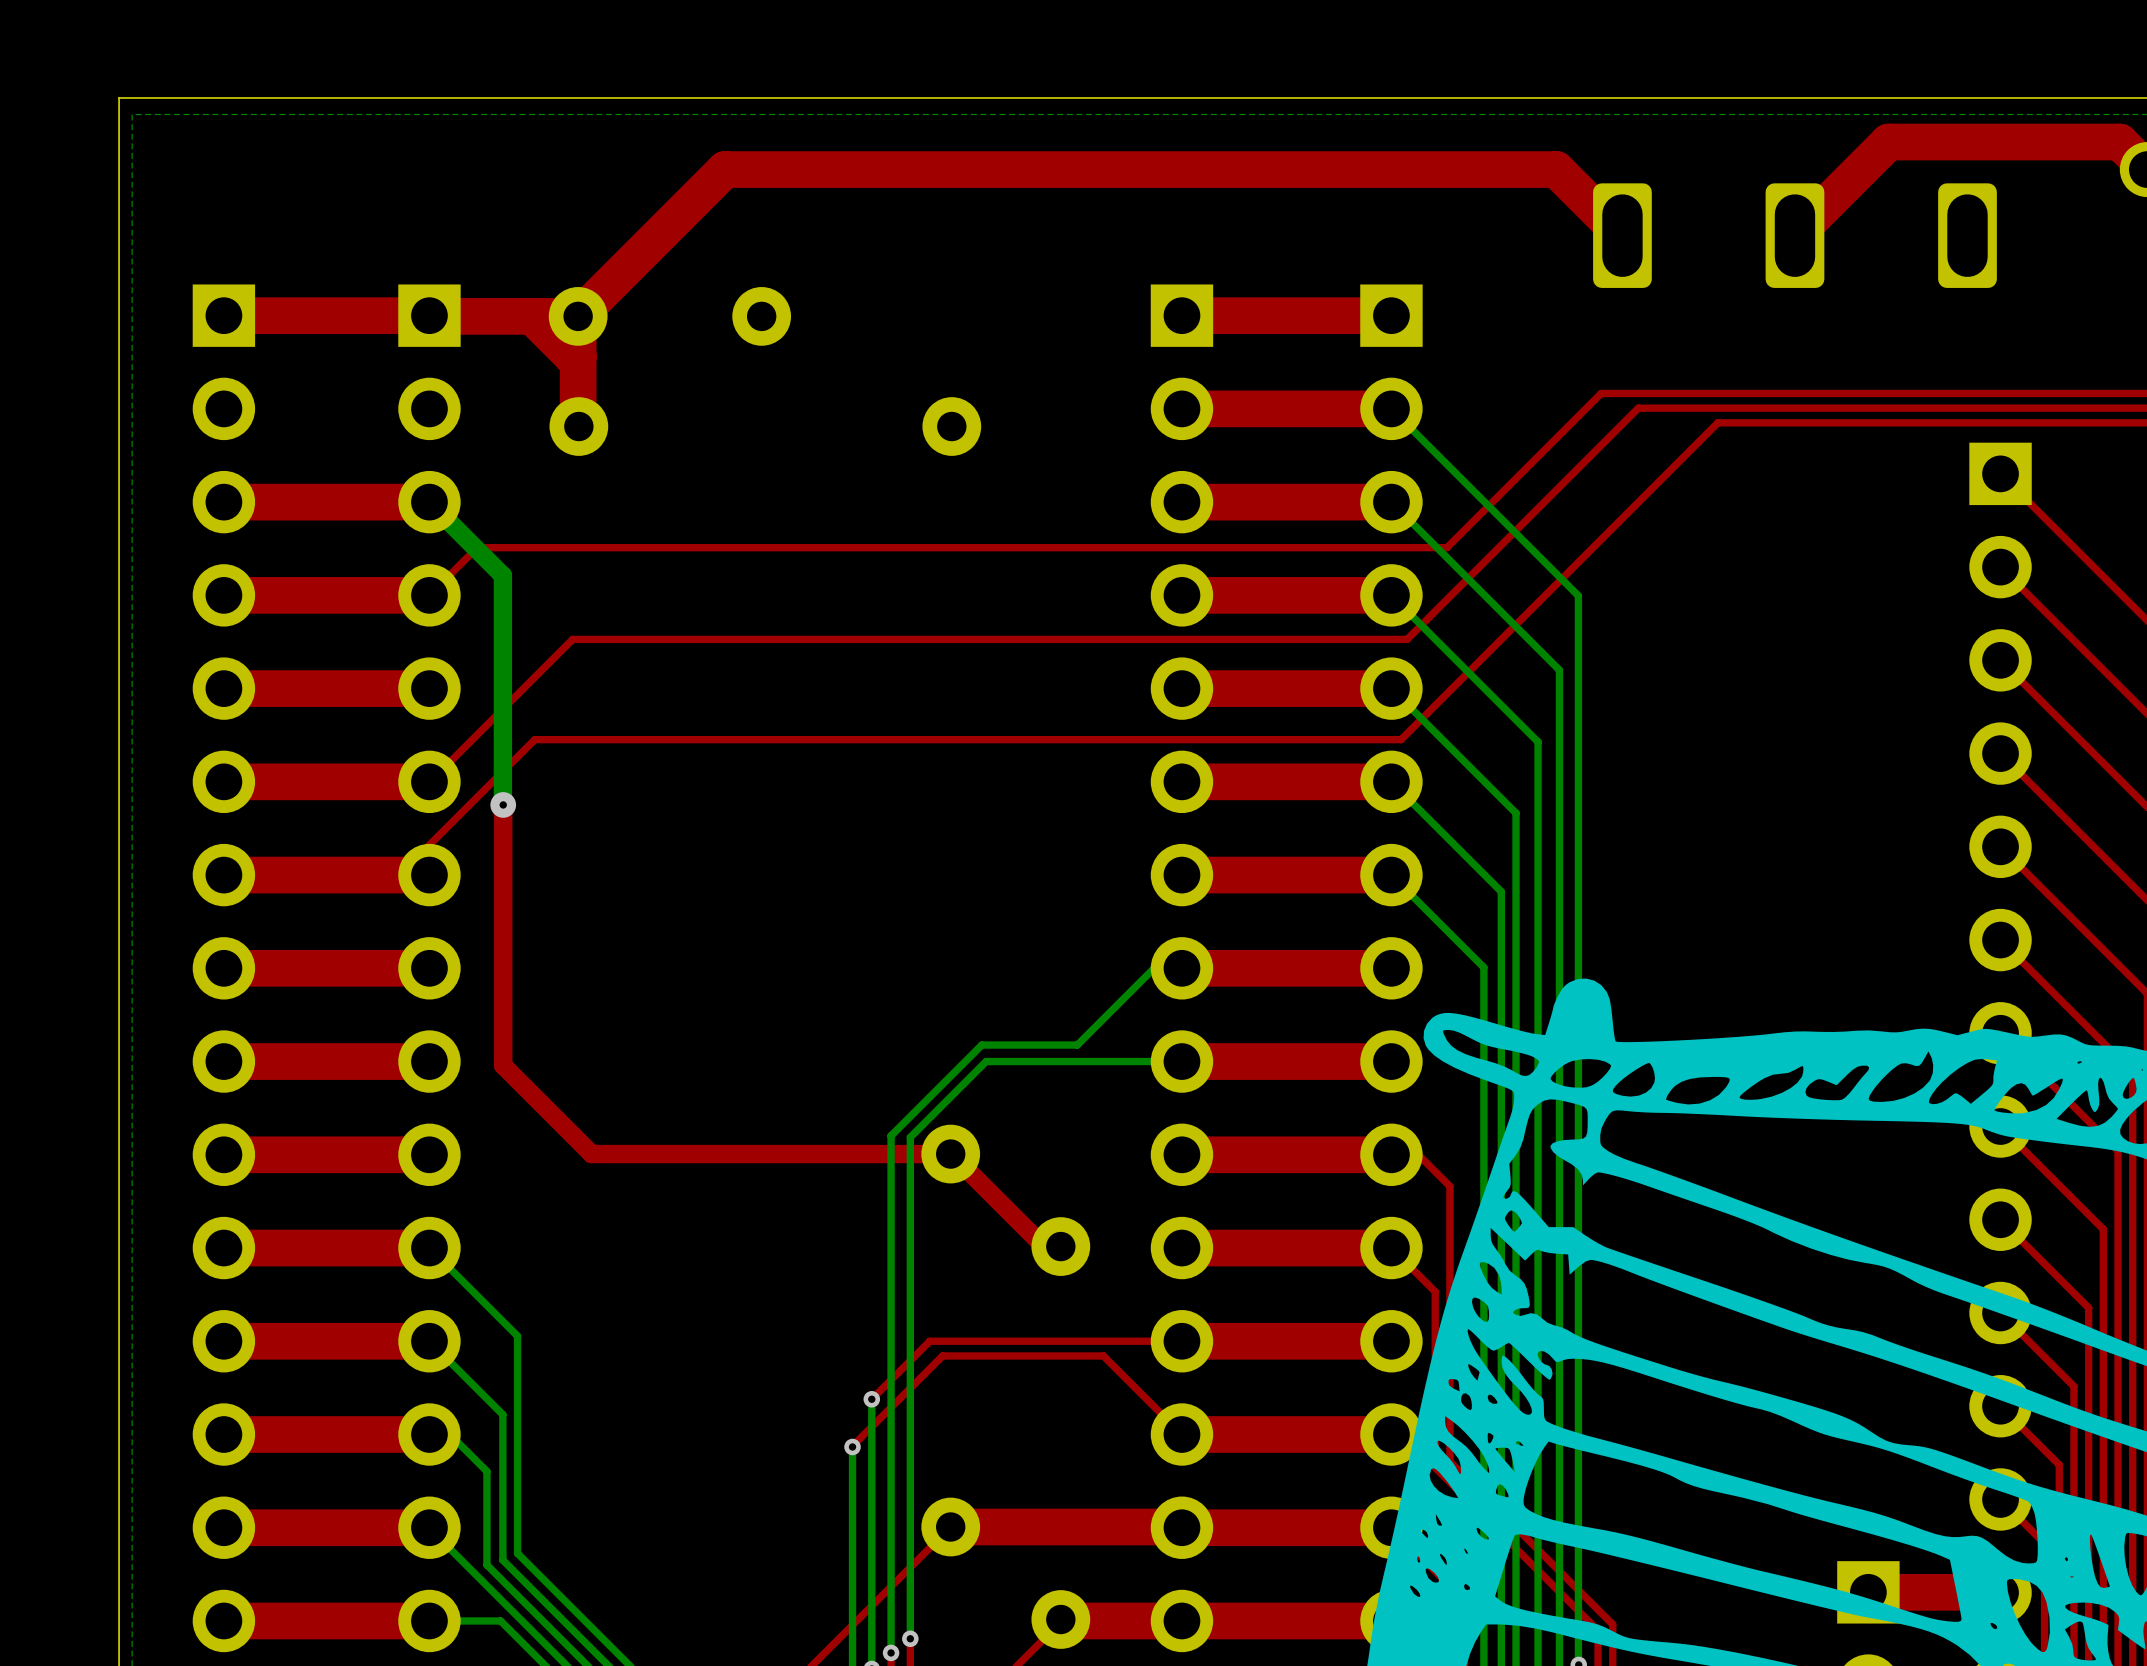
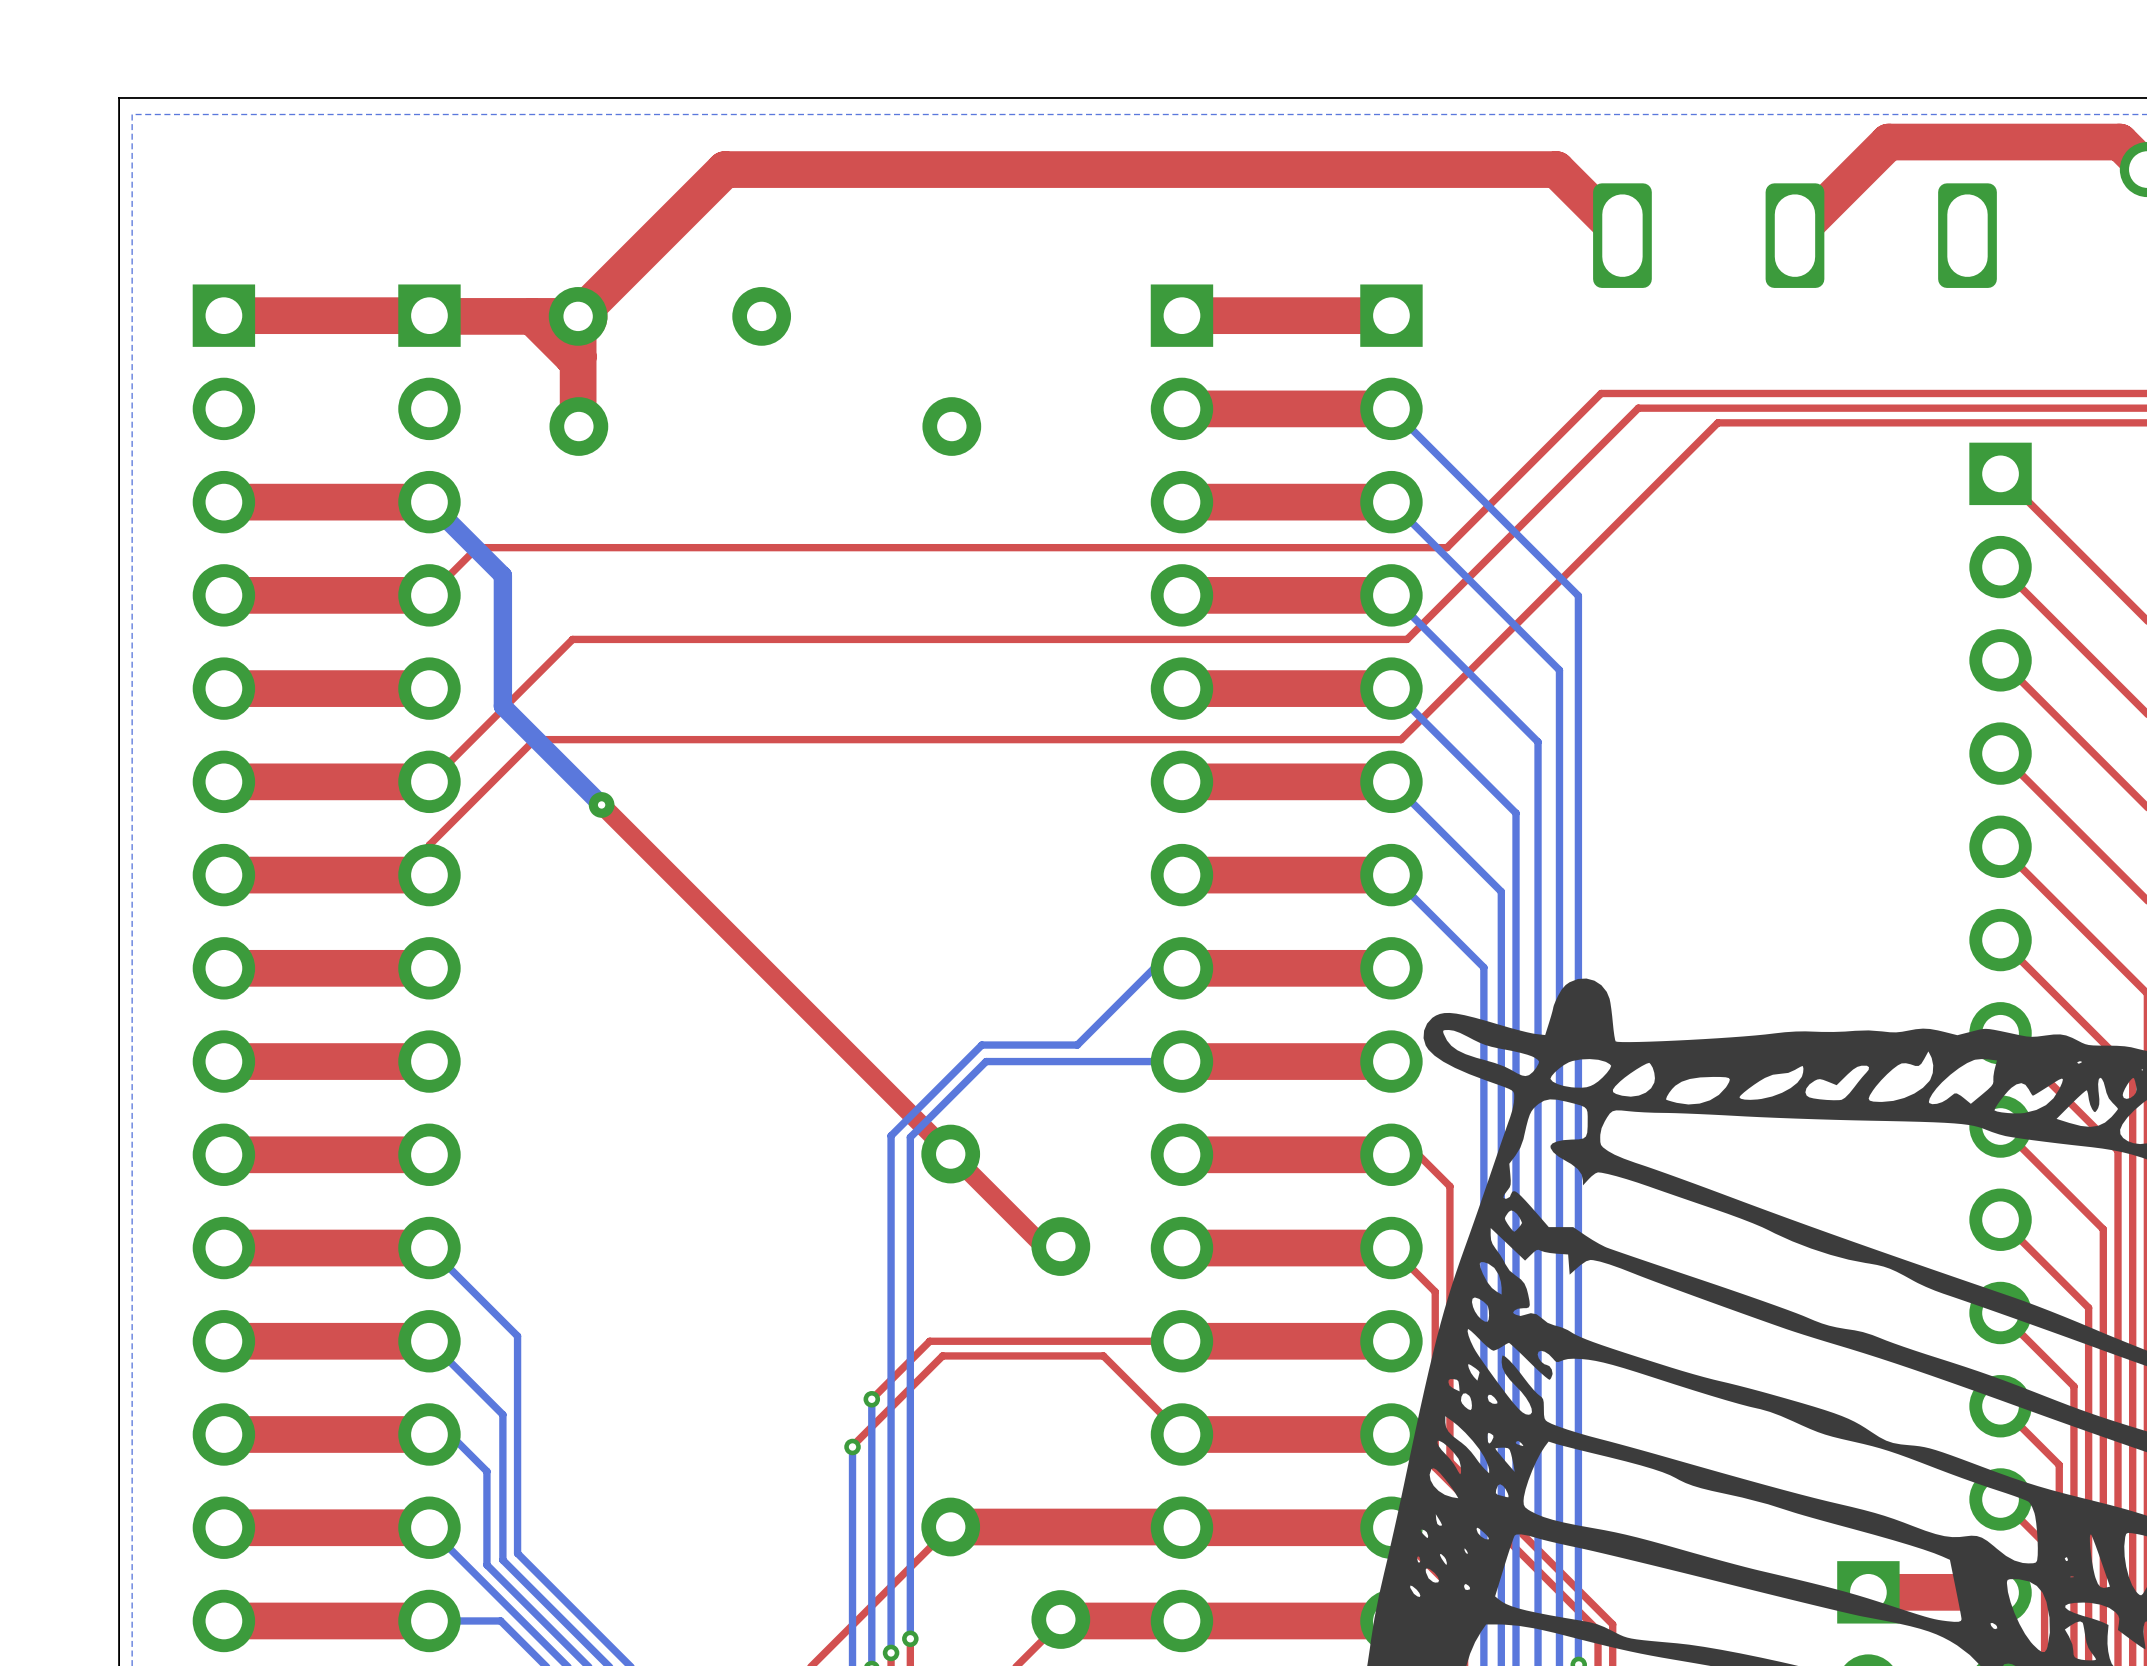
bottom track: (502, 706) (502, 804) -> (502, 706) (601, 804)
top track: (503, 804) (503, 1065) (591, 1154) (950, 1154) -> (601, 804) (950, 1154)
via position: (503, 804) -> (601, 804)

